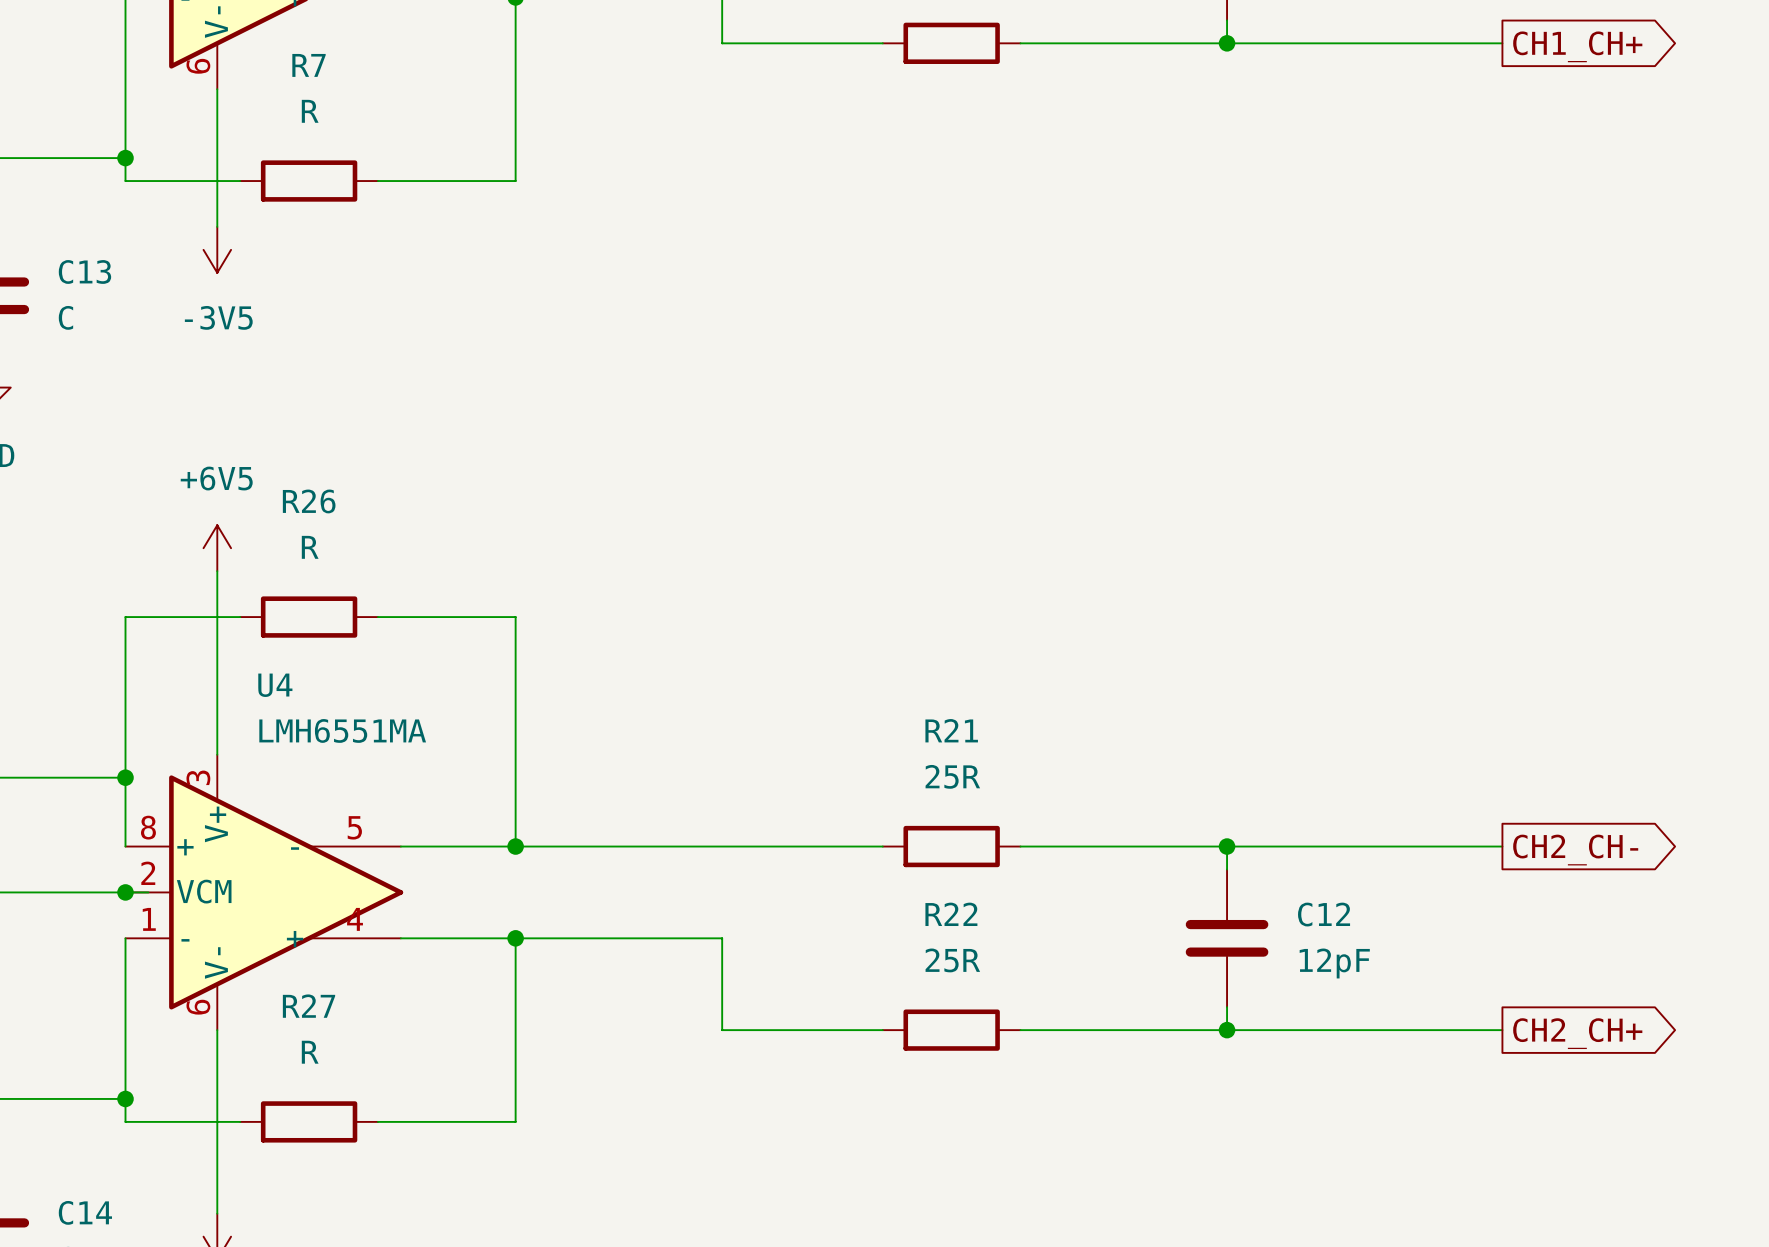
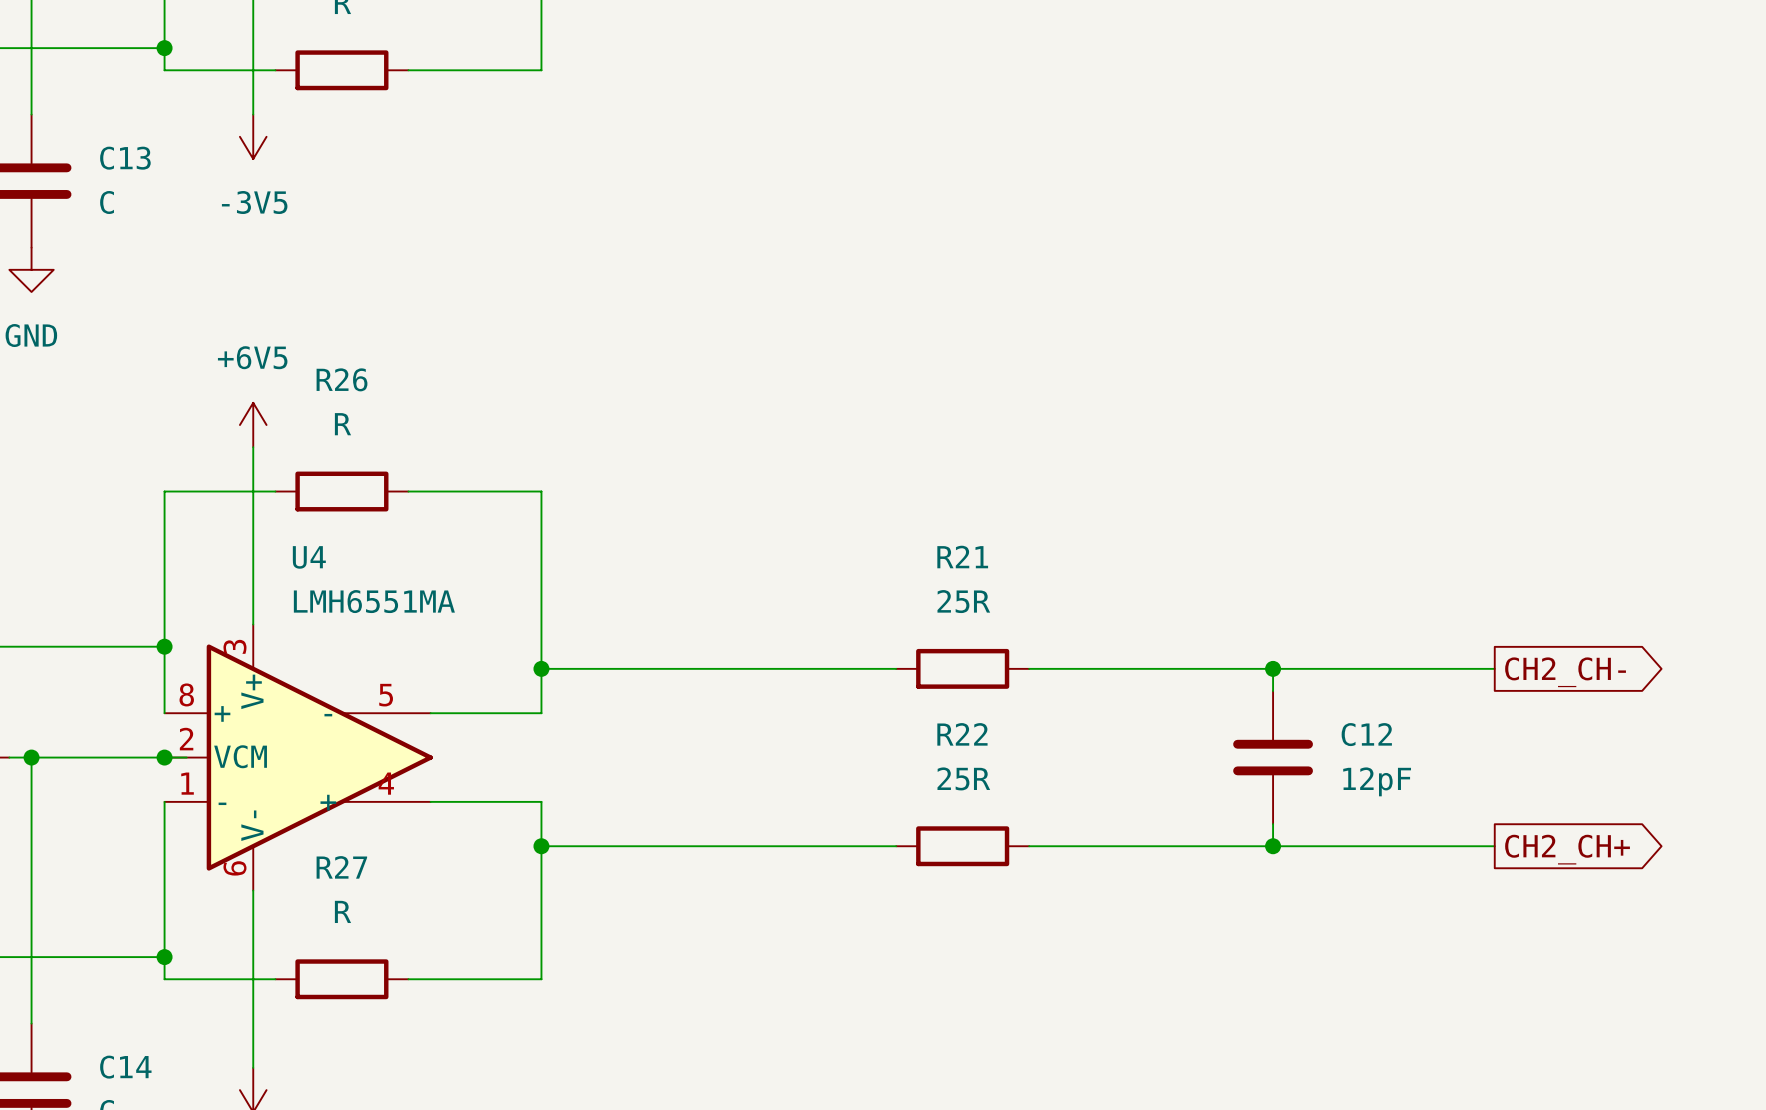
wire: (515, 846) (882, 846) -> (541, 668) (896, 668)
junction position: (515, 846) -> (541, 668)
R21 position: (951, 846) -> (962, 668)
wire: (1020, 846) (1502, 846) -> (1029, 668) (1494, 668)
wire: (1227, 846) (1227, 869) -> (1273, 668) (1273, 691)
junction position: (1227, 846) -> (1273, 668)
global label position: CH2_CH- (1575, 850) -> CH2_CH- (1565, 672)
wire: (515, 938) (722, 938) (722, 1030) (882, 1030) -> none
junction position: (515, 938) -> (541, 846)
C12 position: (1227, 938) -> (1273, 757)
wire: none -> (541, 846) (896, 846)
wire: (1227, 1007) (1227, 1030) -> (1273, 824) (1273, 846)
R22 position: (951, 1030) -> (962, 846)
wire: (1020, 1030) (1502, 1030) -> (1029, 846) (1494, 846)
junction position: (1227, 1030) -> (1273, 846)
global label position: CH2_CH+ (1577, 1033) -> CH2_CH+ (1567, 849)

